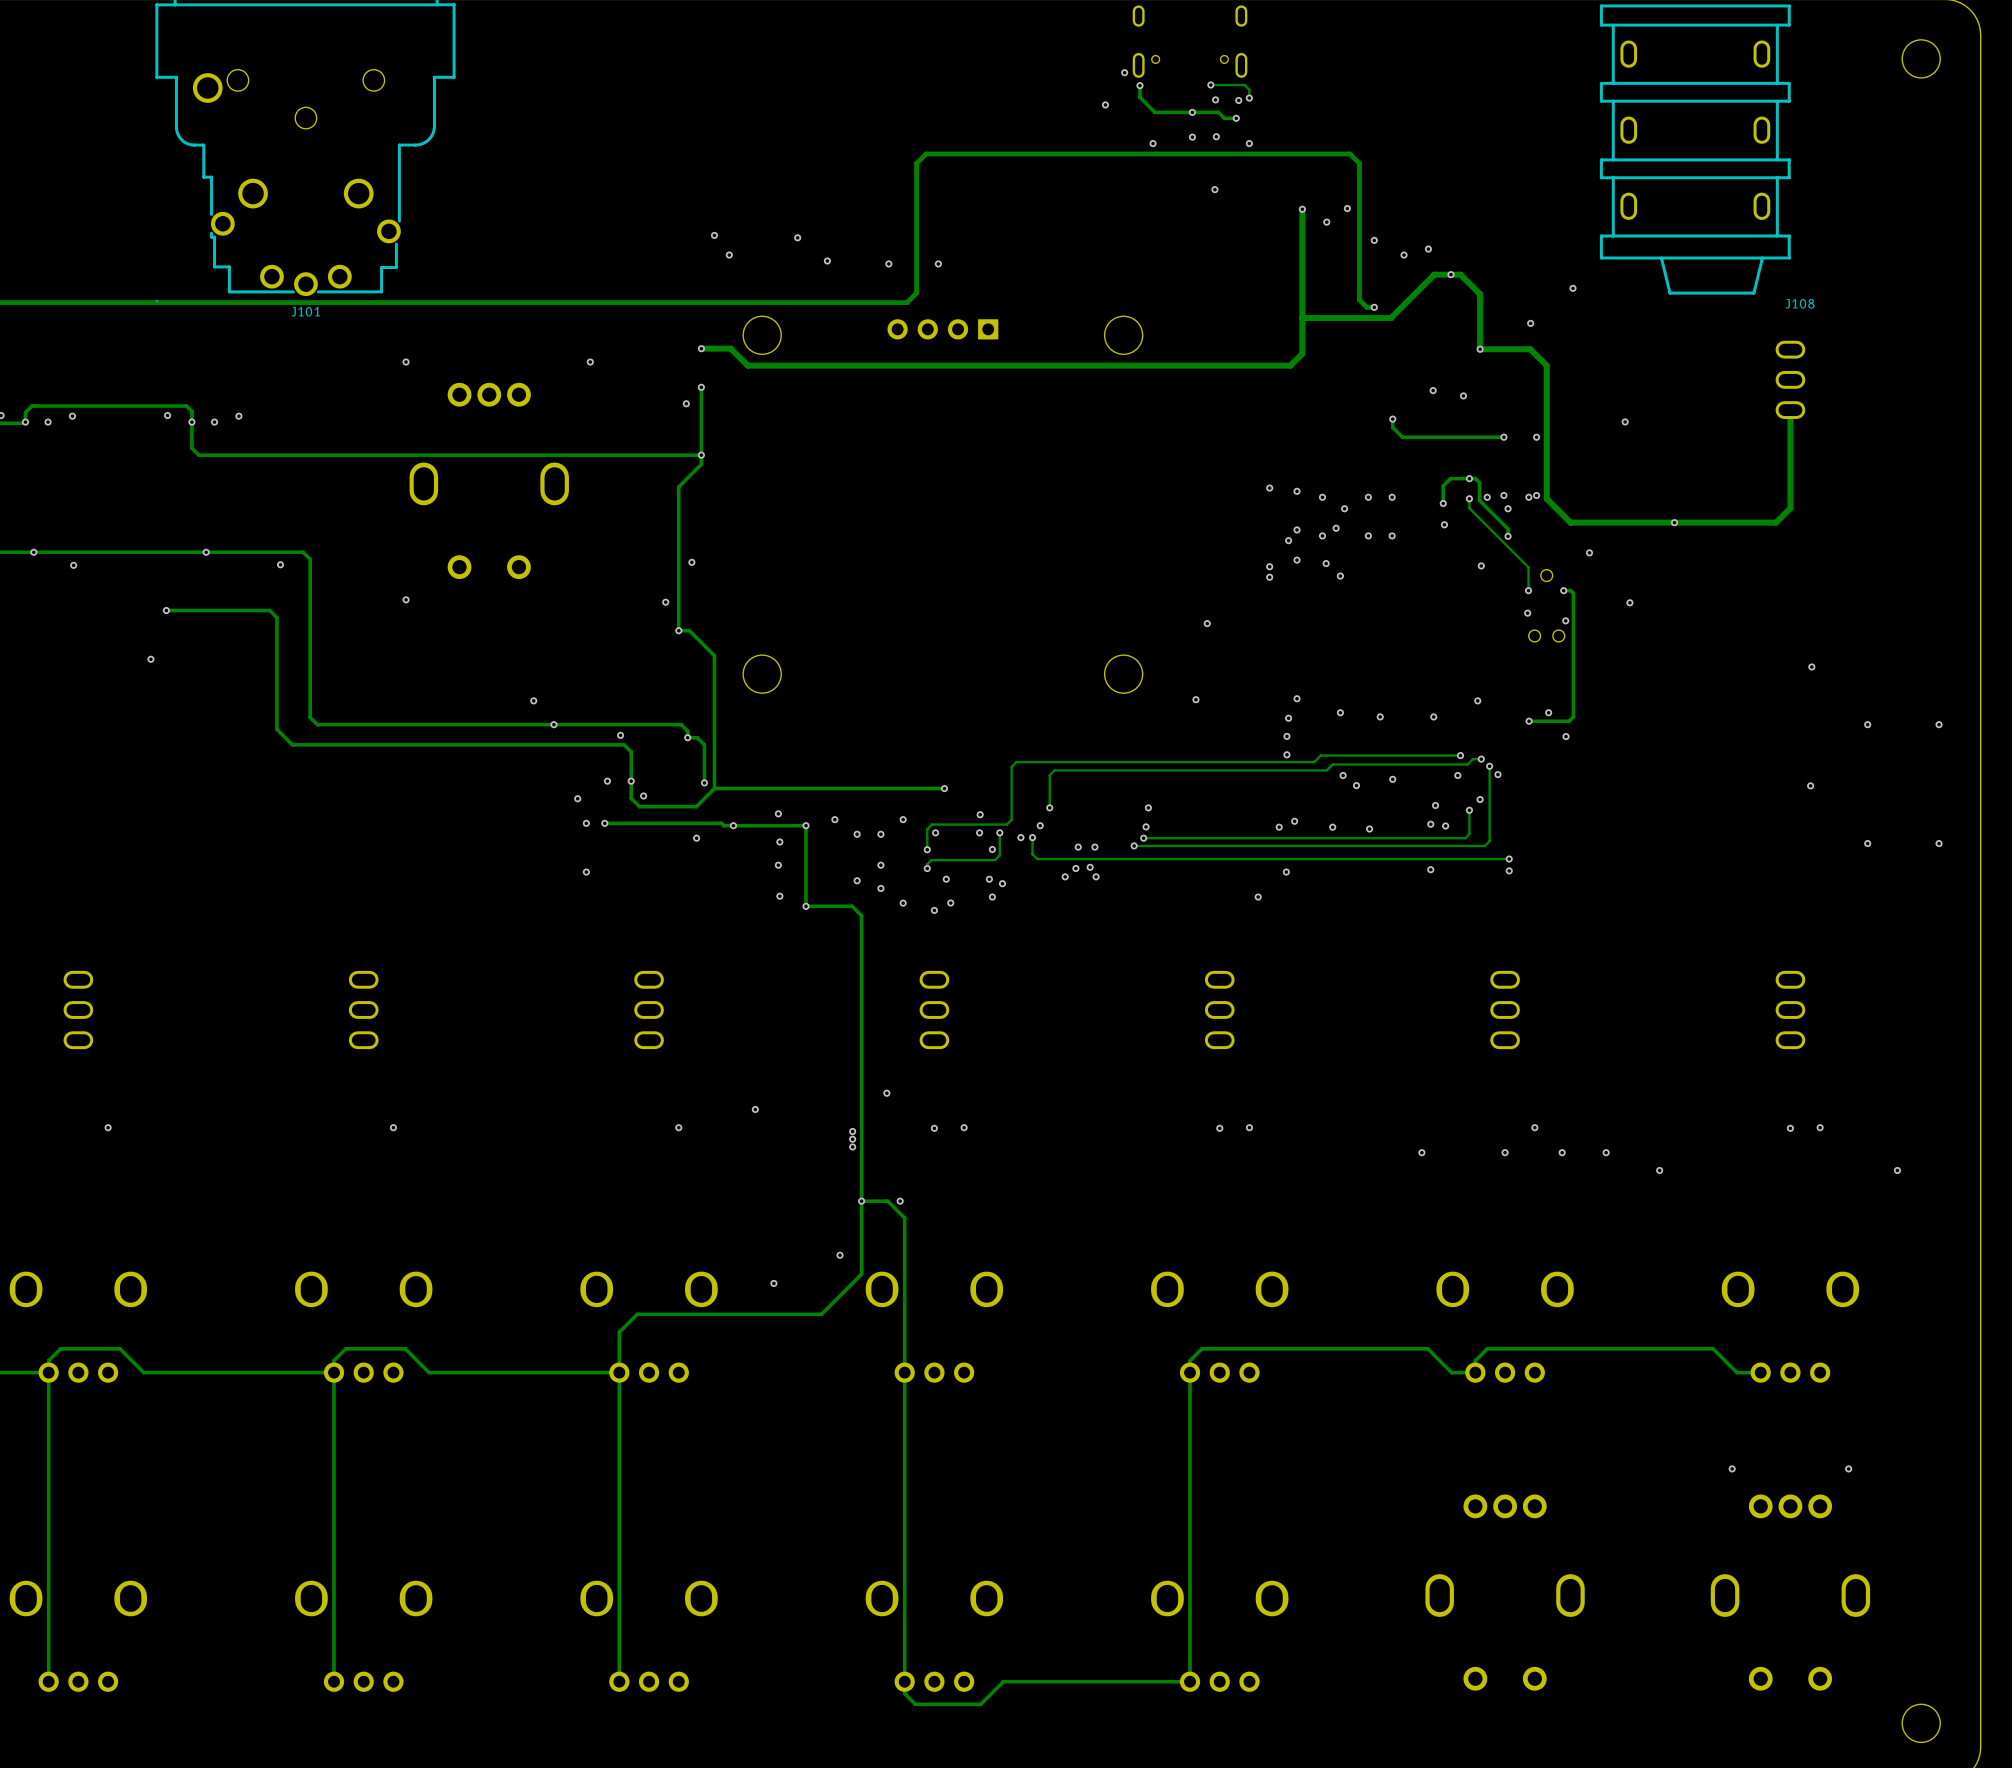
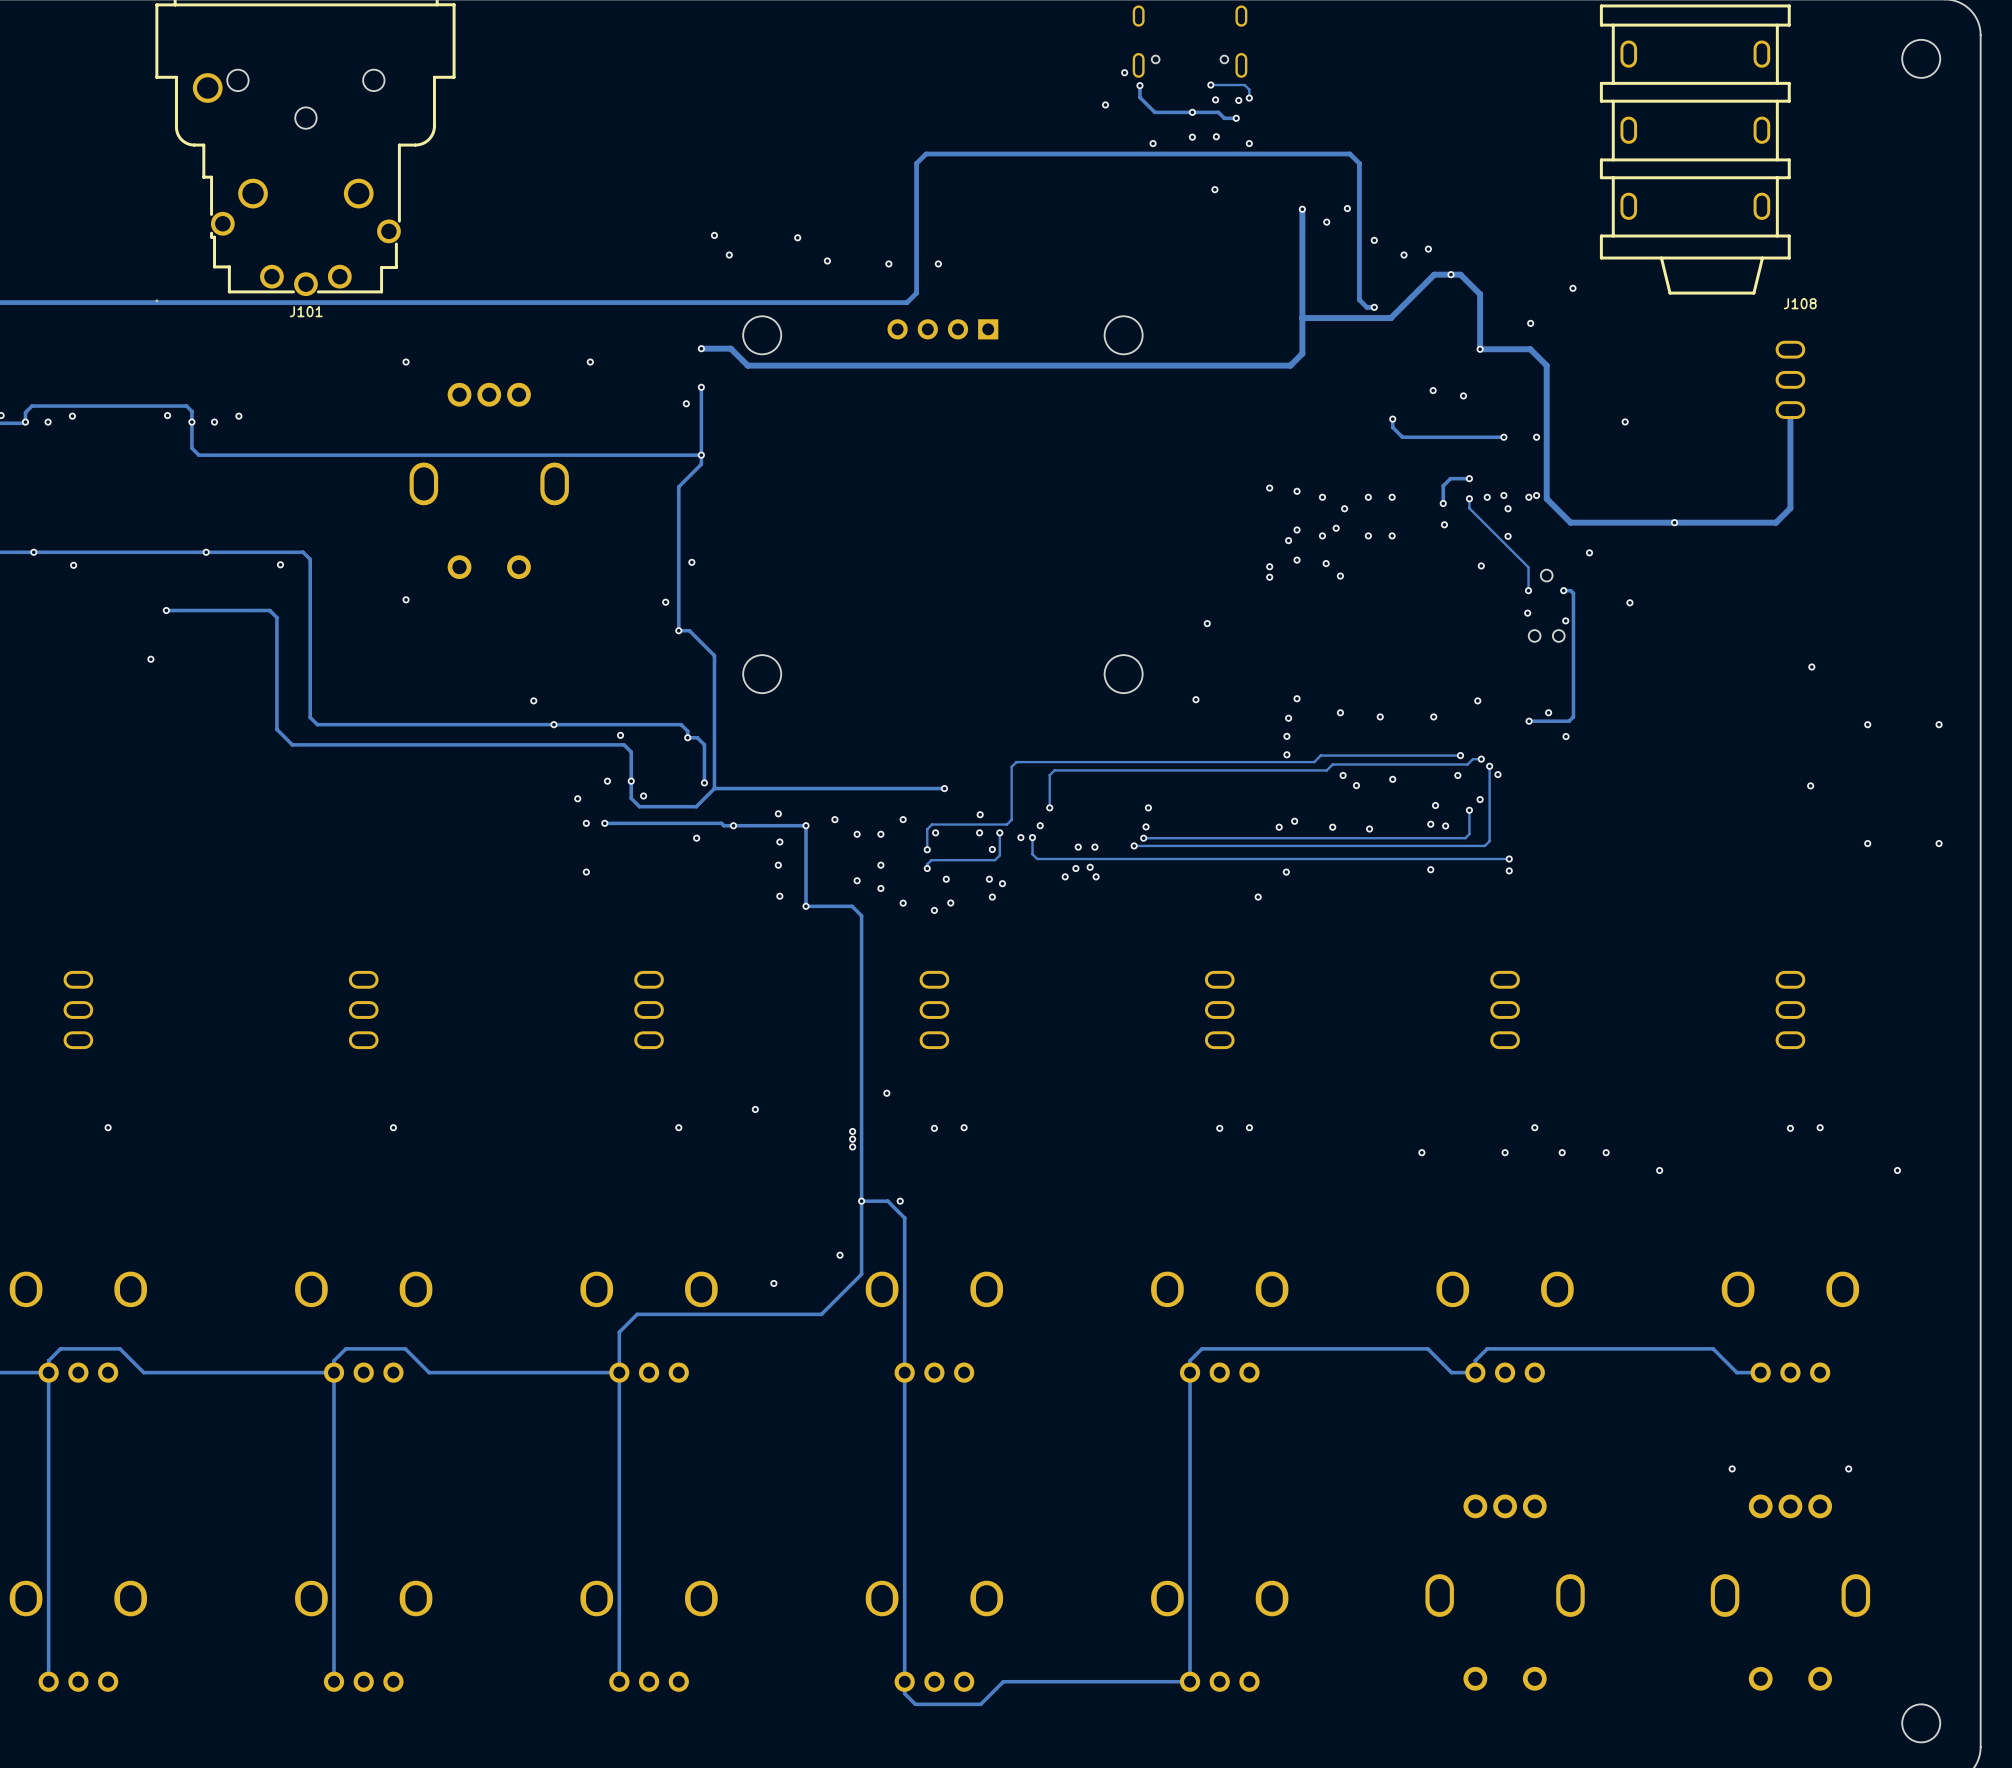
track: (1469, 478) (1475, 478) (1479, 482) (1479, 500) (1508, 529) (1508, 536) -> none

